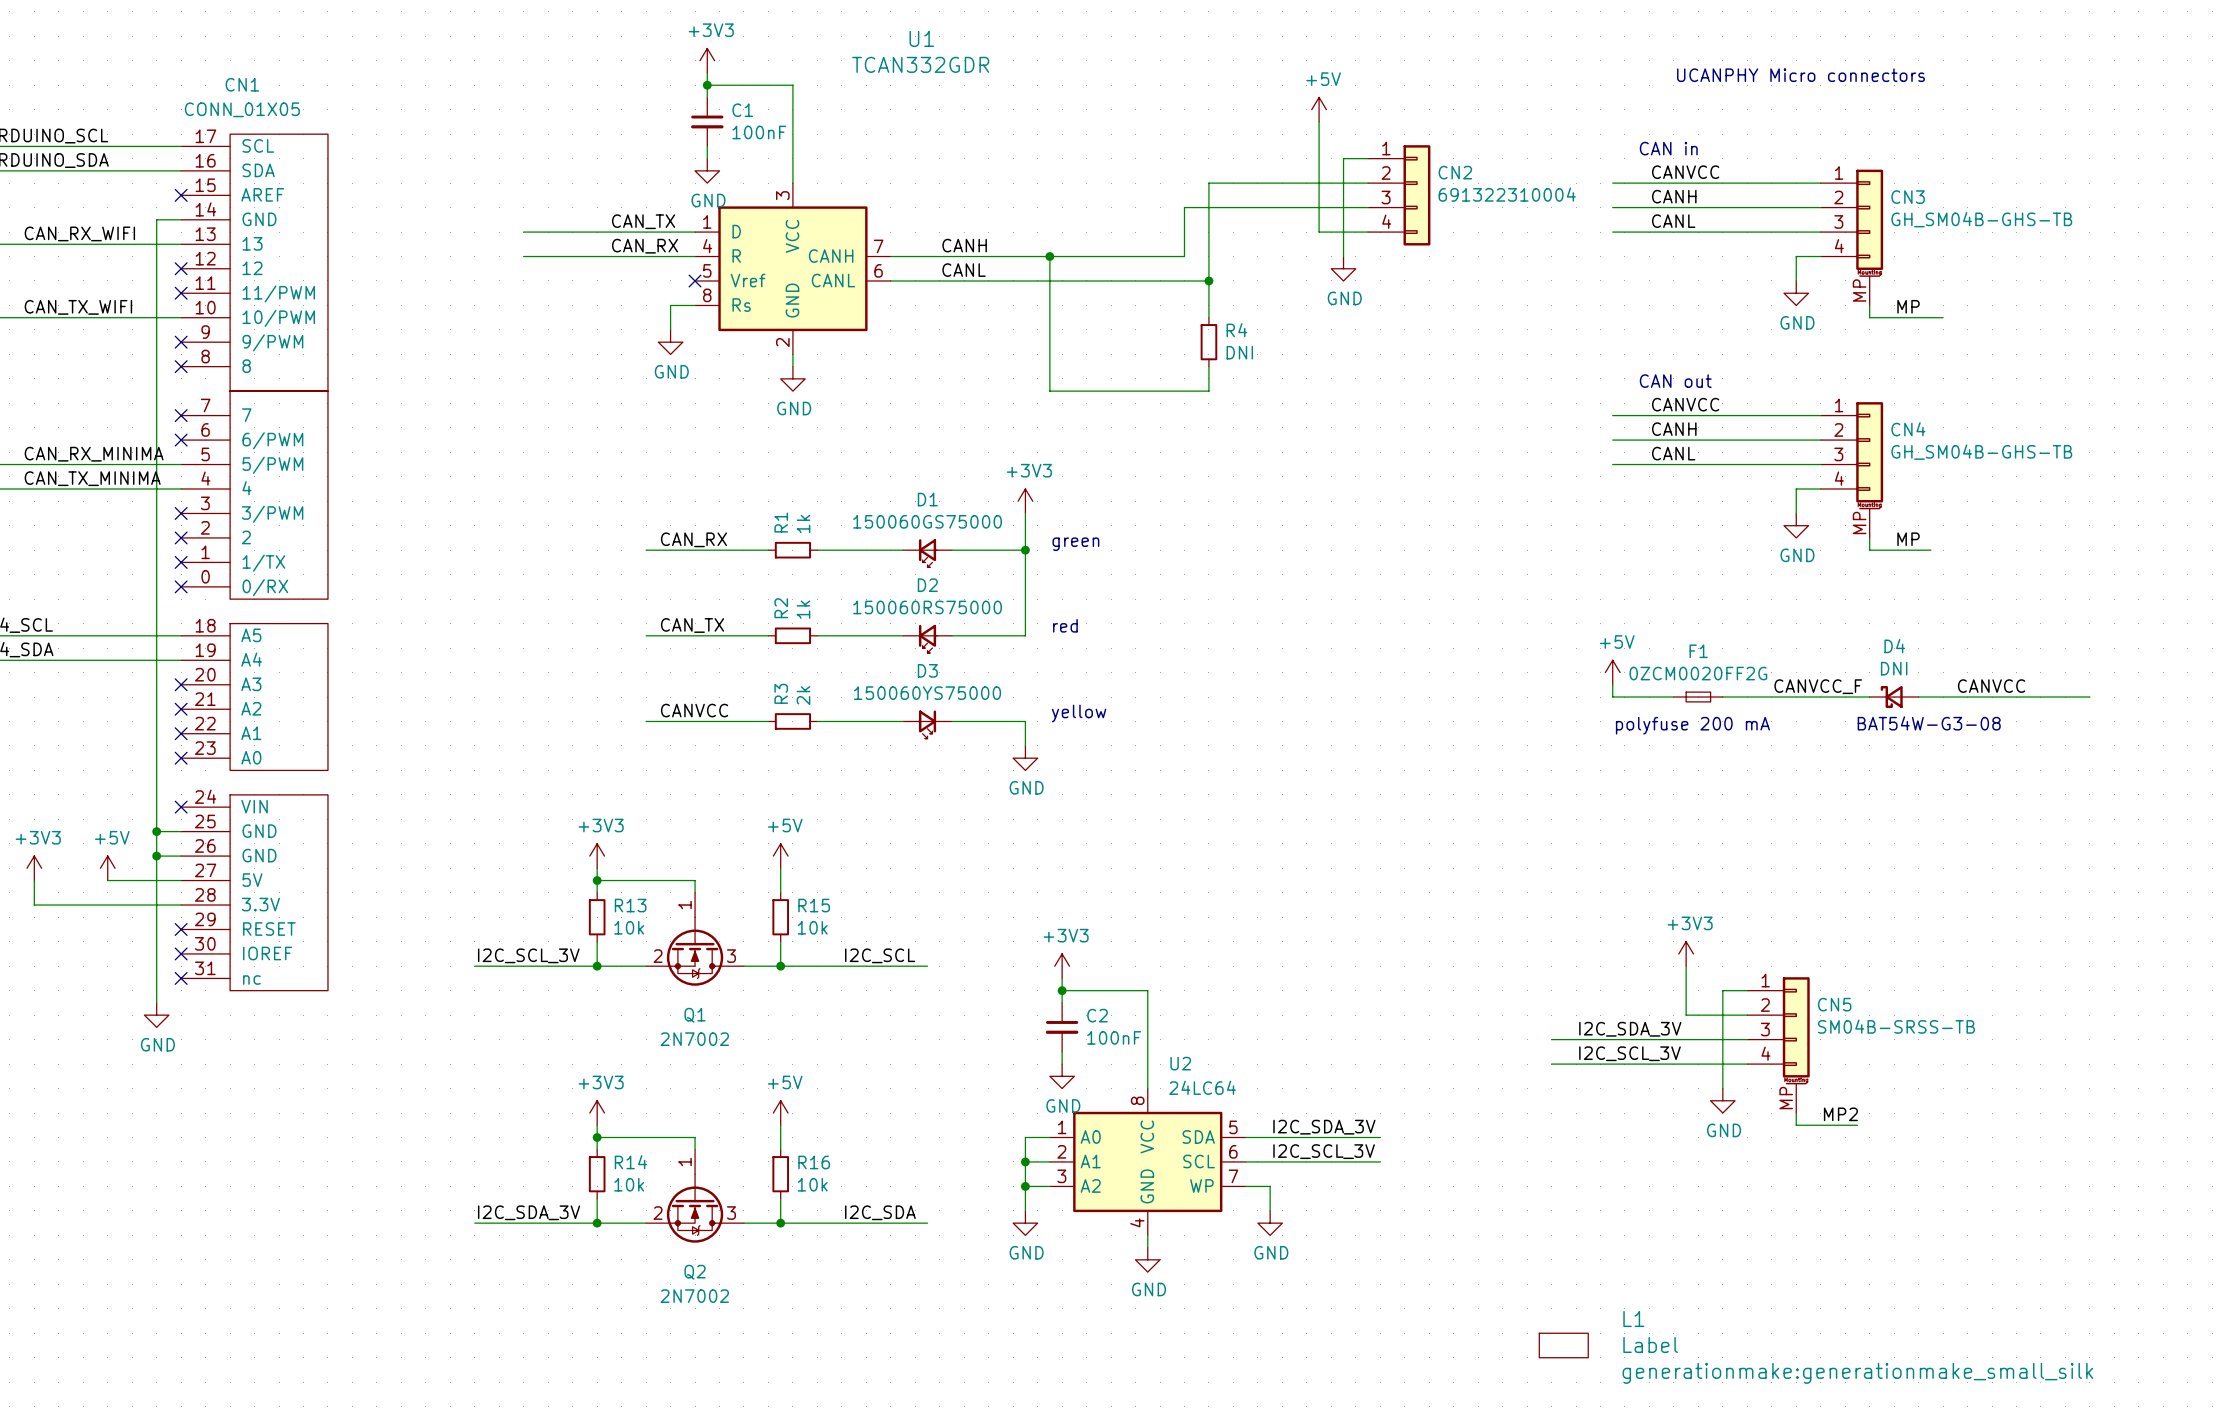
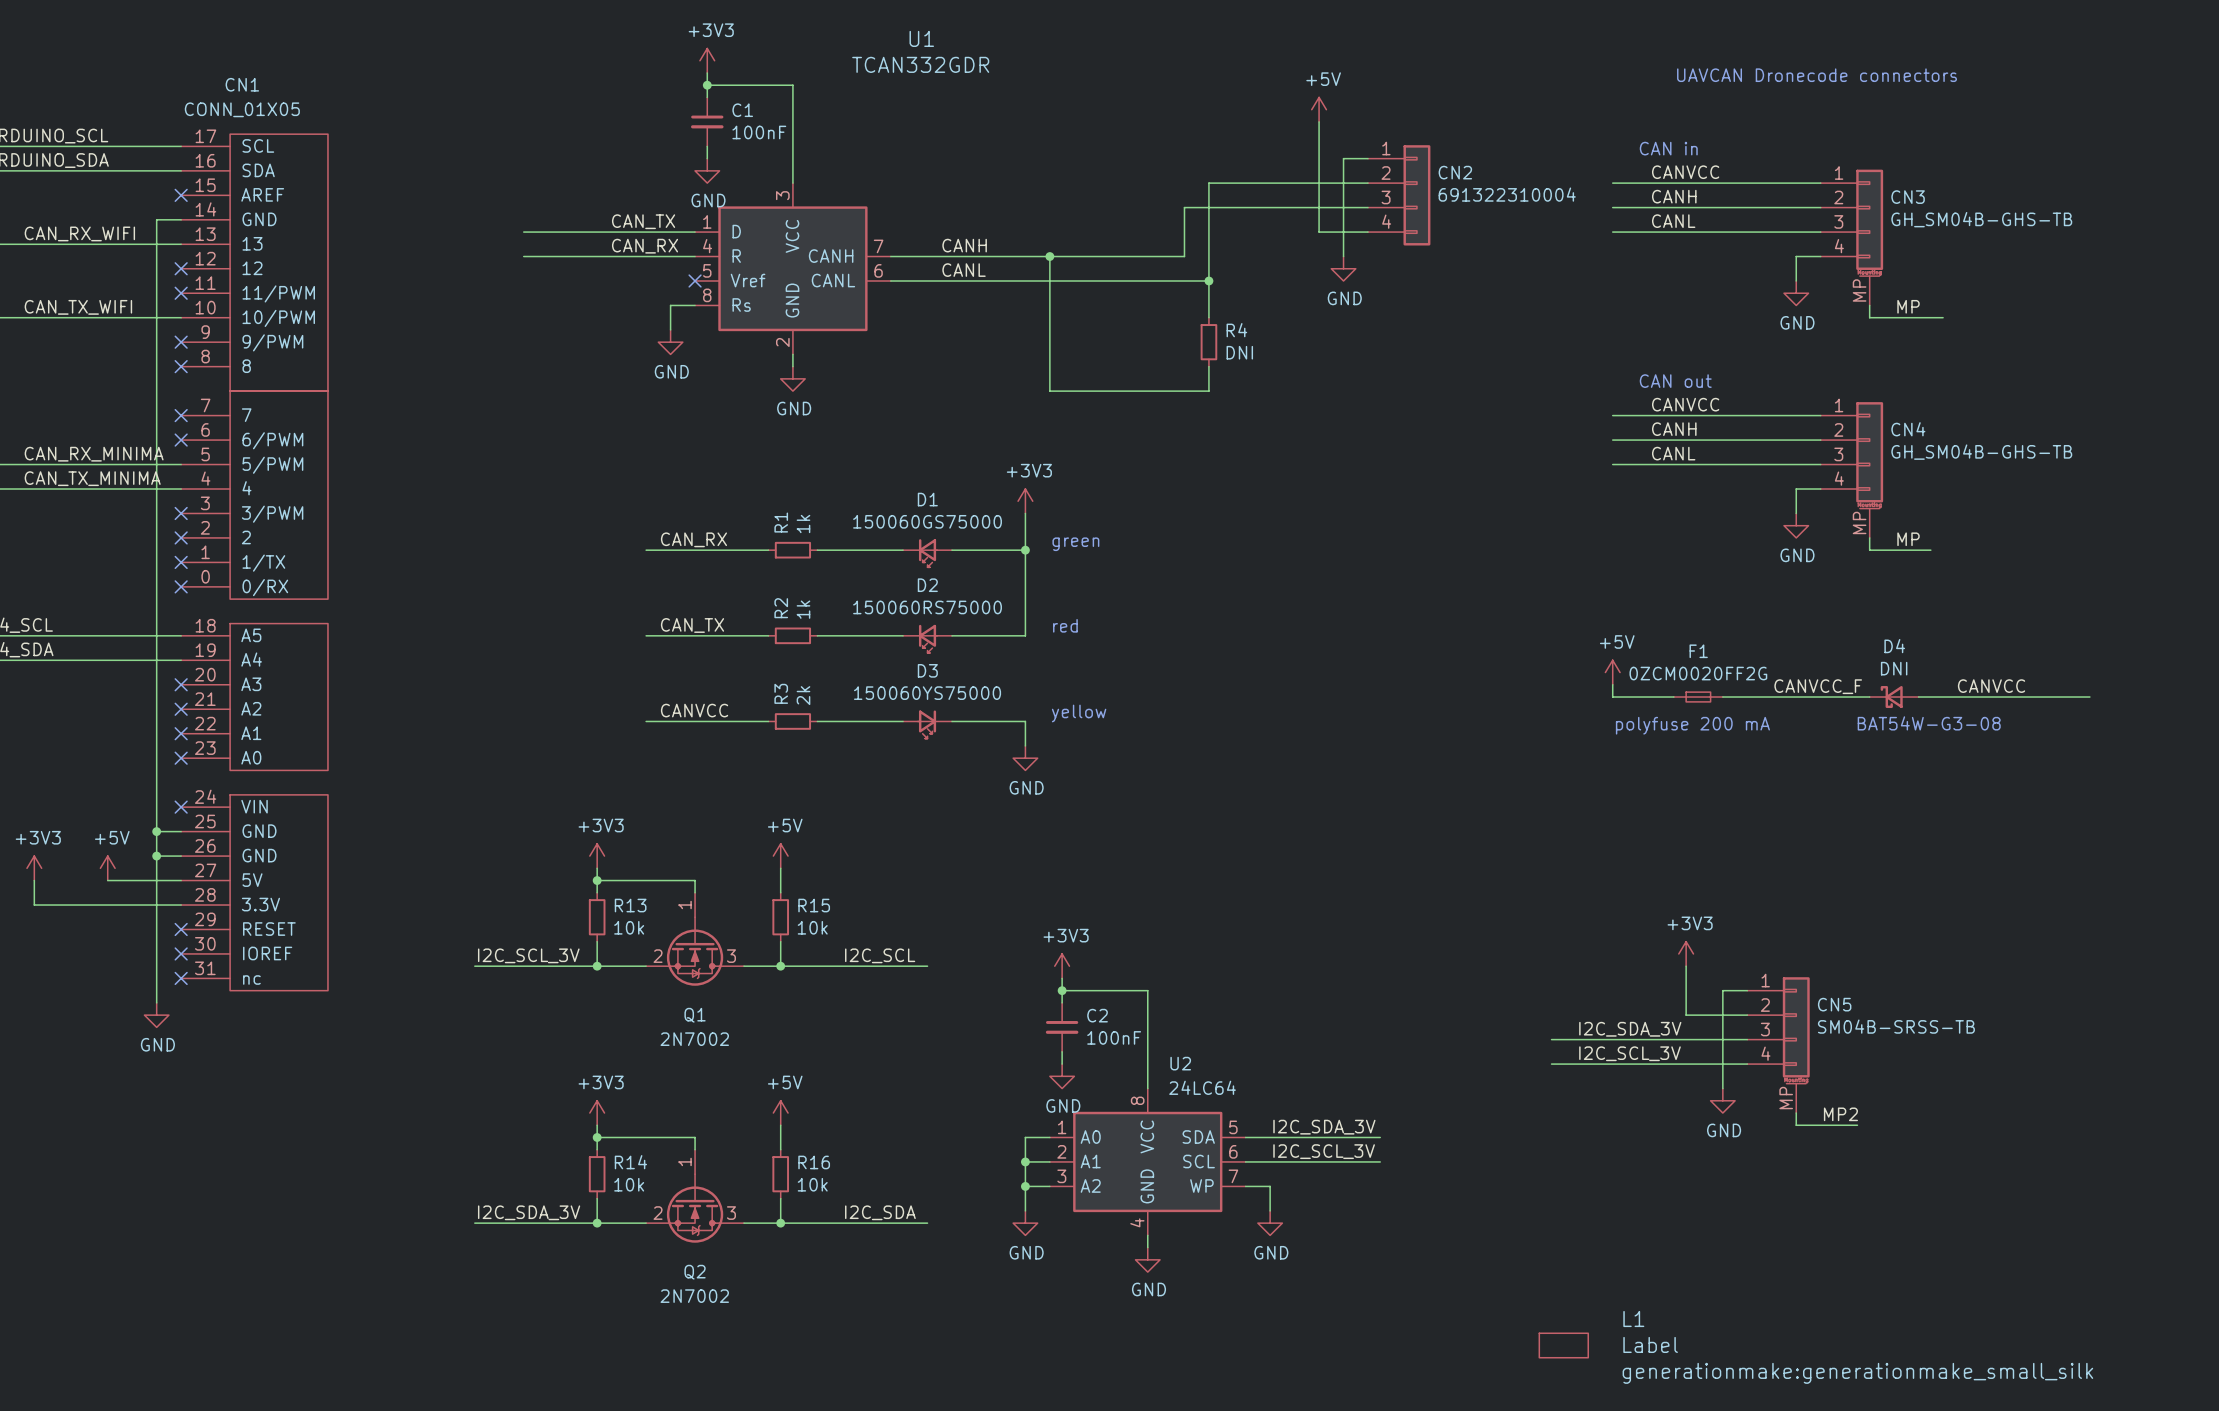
text: UCANPHY Micro connectors (1801, 75) -> UAVCAN Dronecode connectors (1817, 75)

